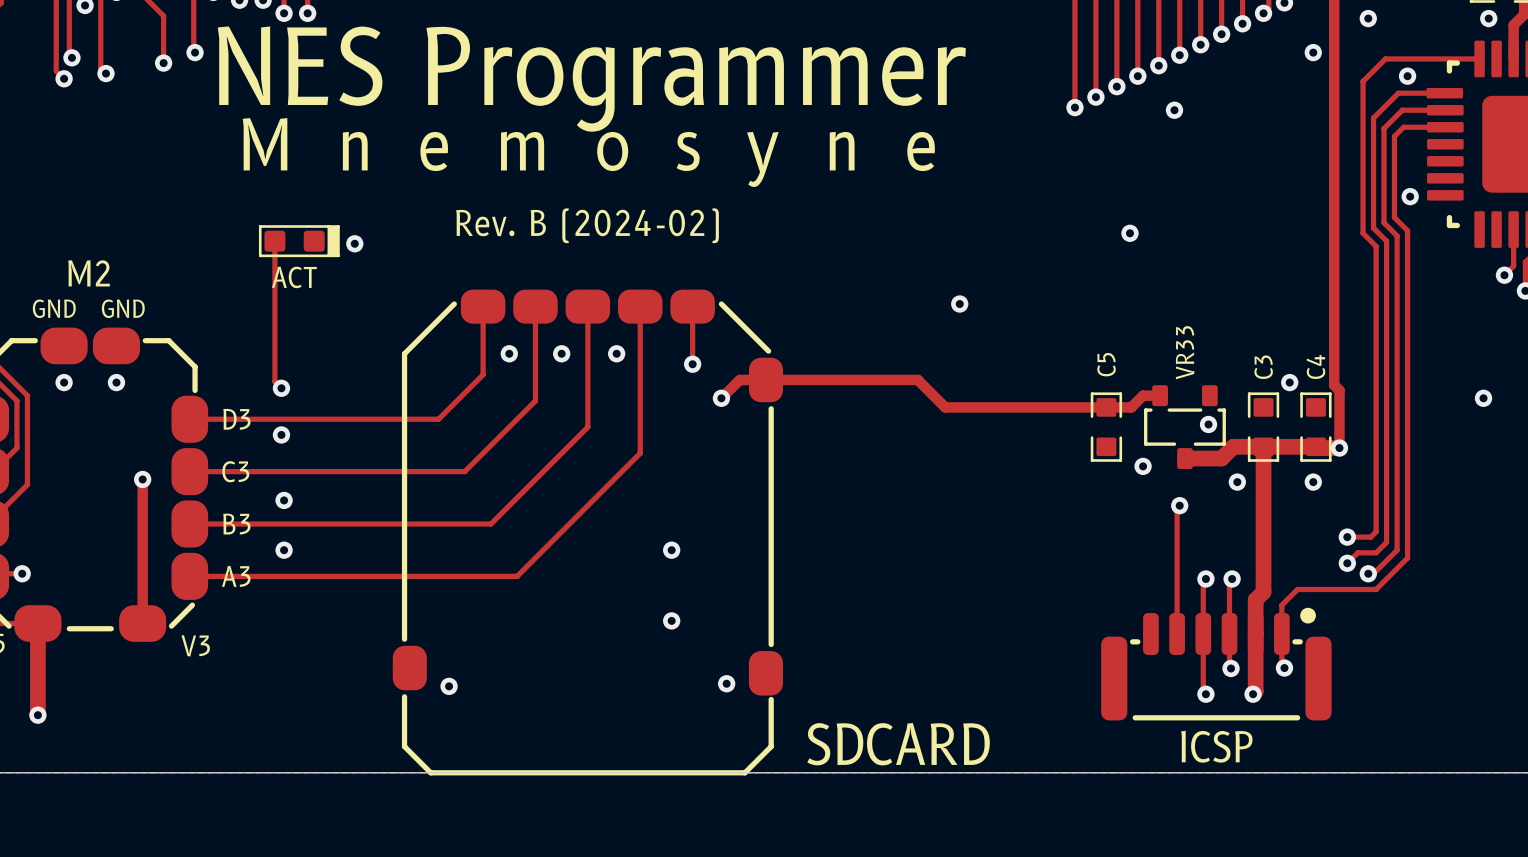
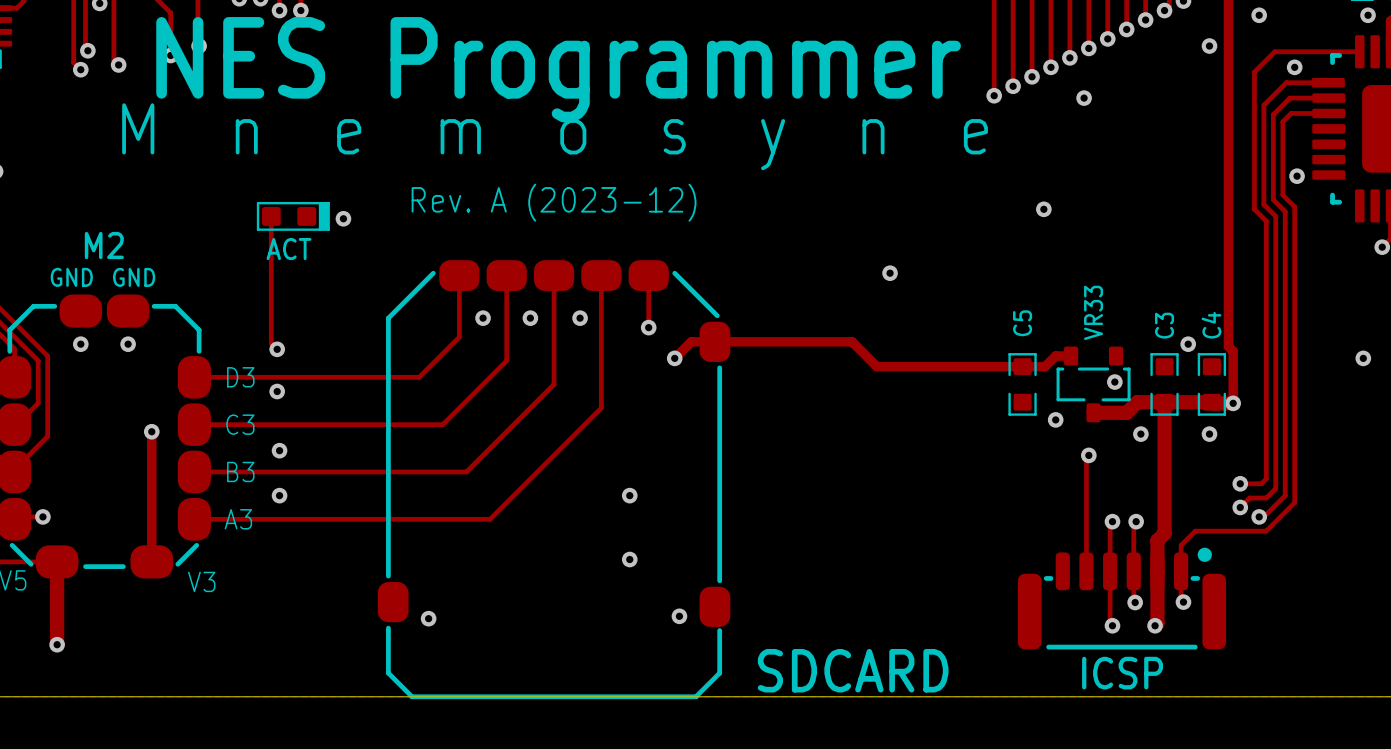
text: Rev. B (2024-02) (587, 225) -> Rev. A (2023-12) (554, 202)

